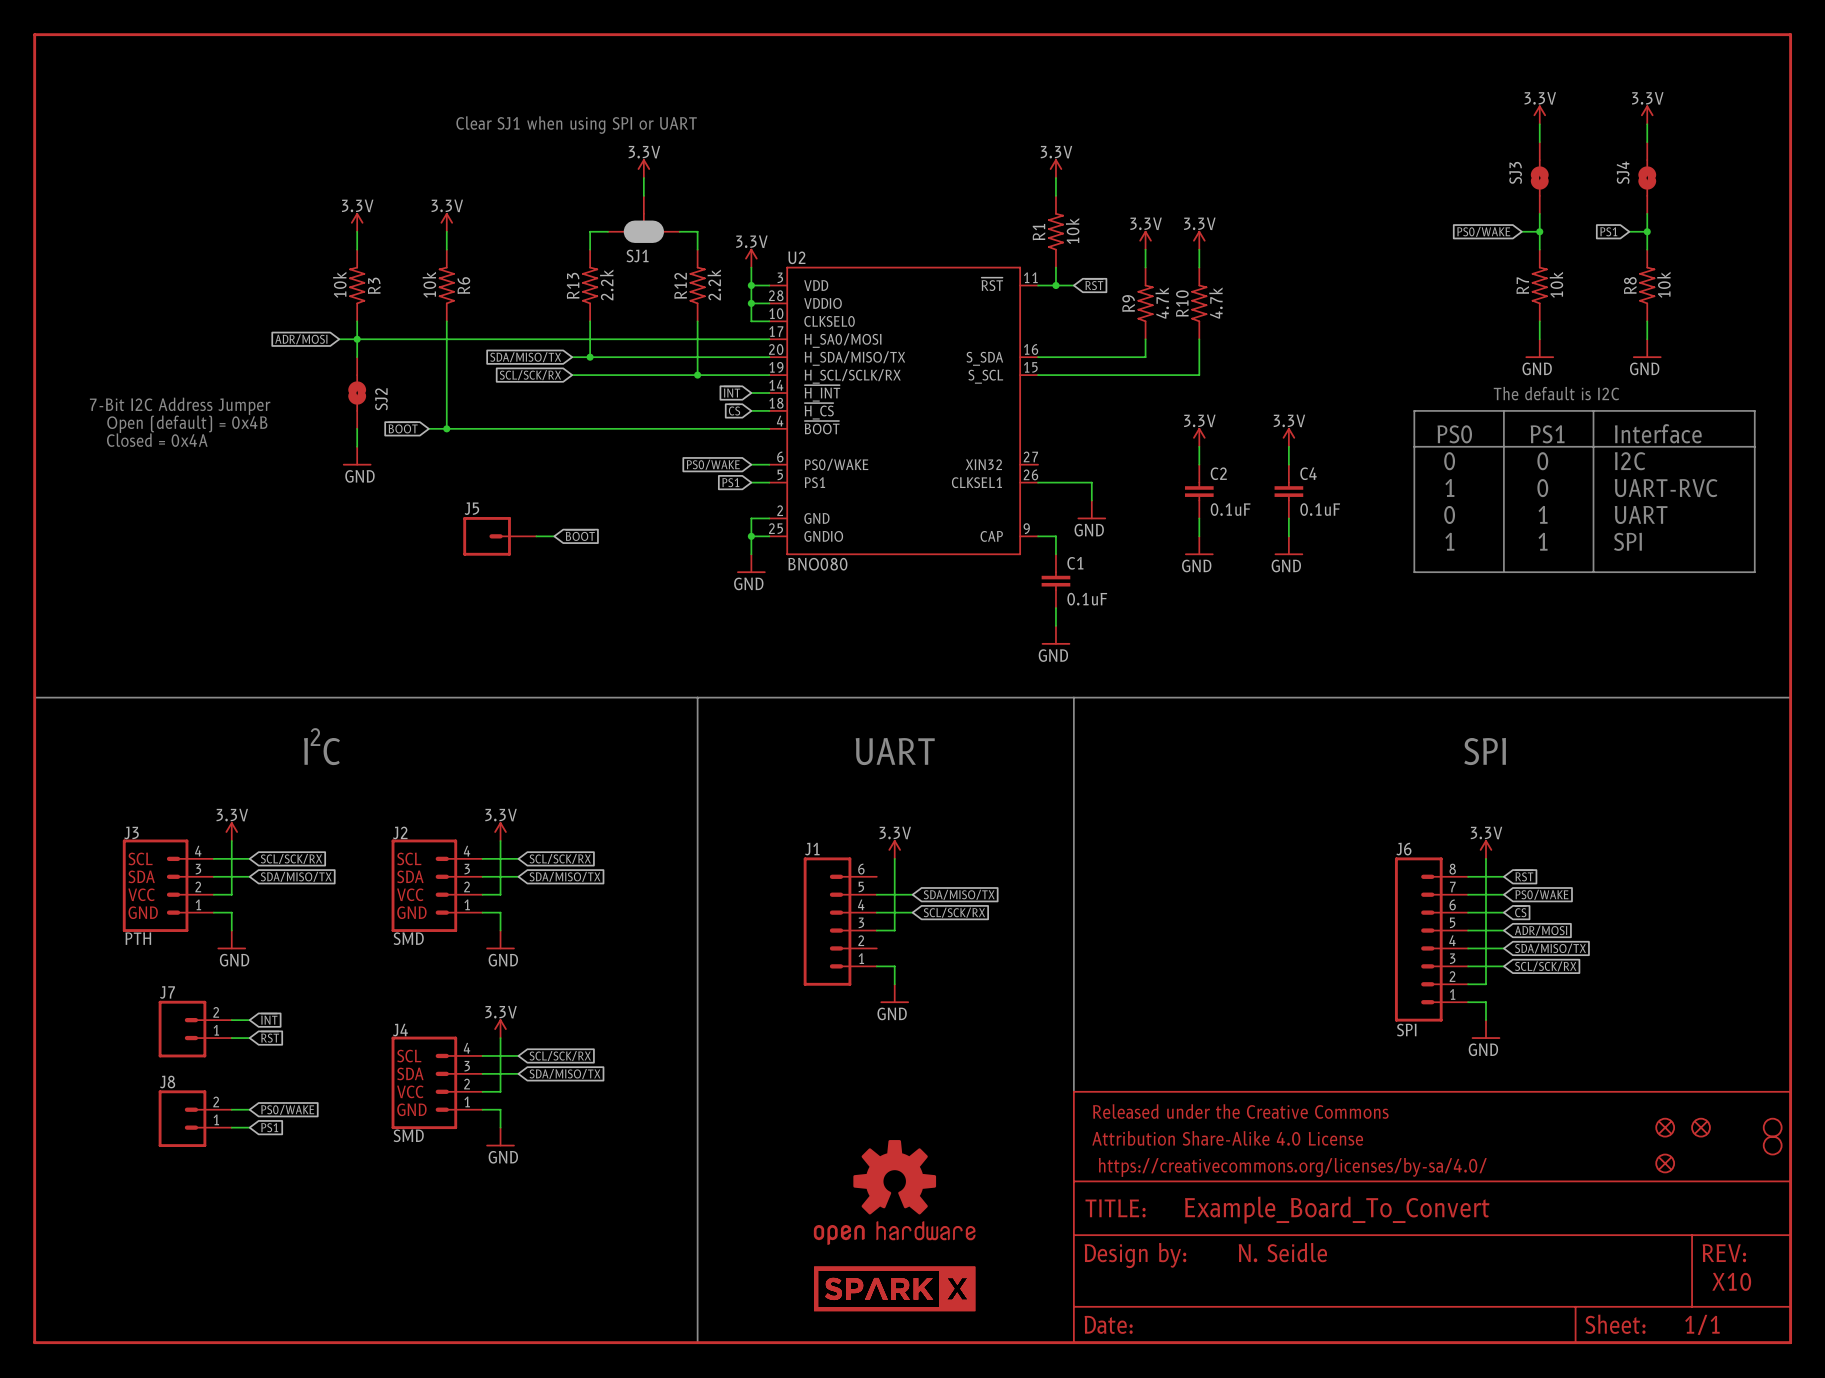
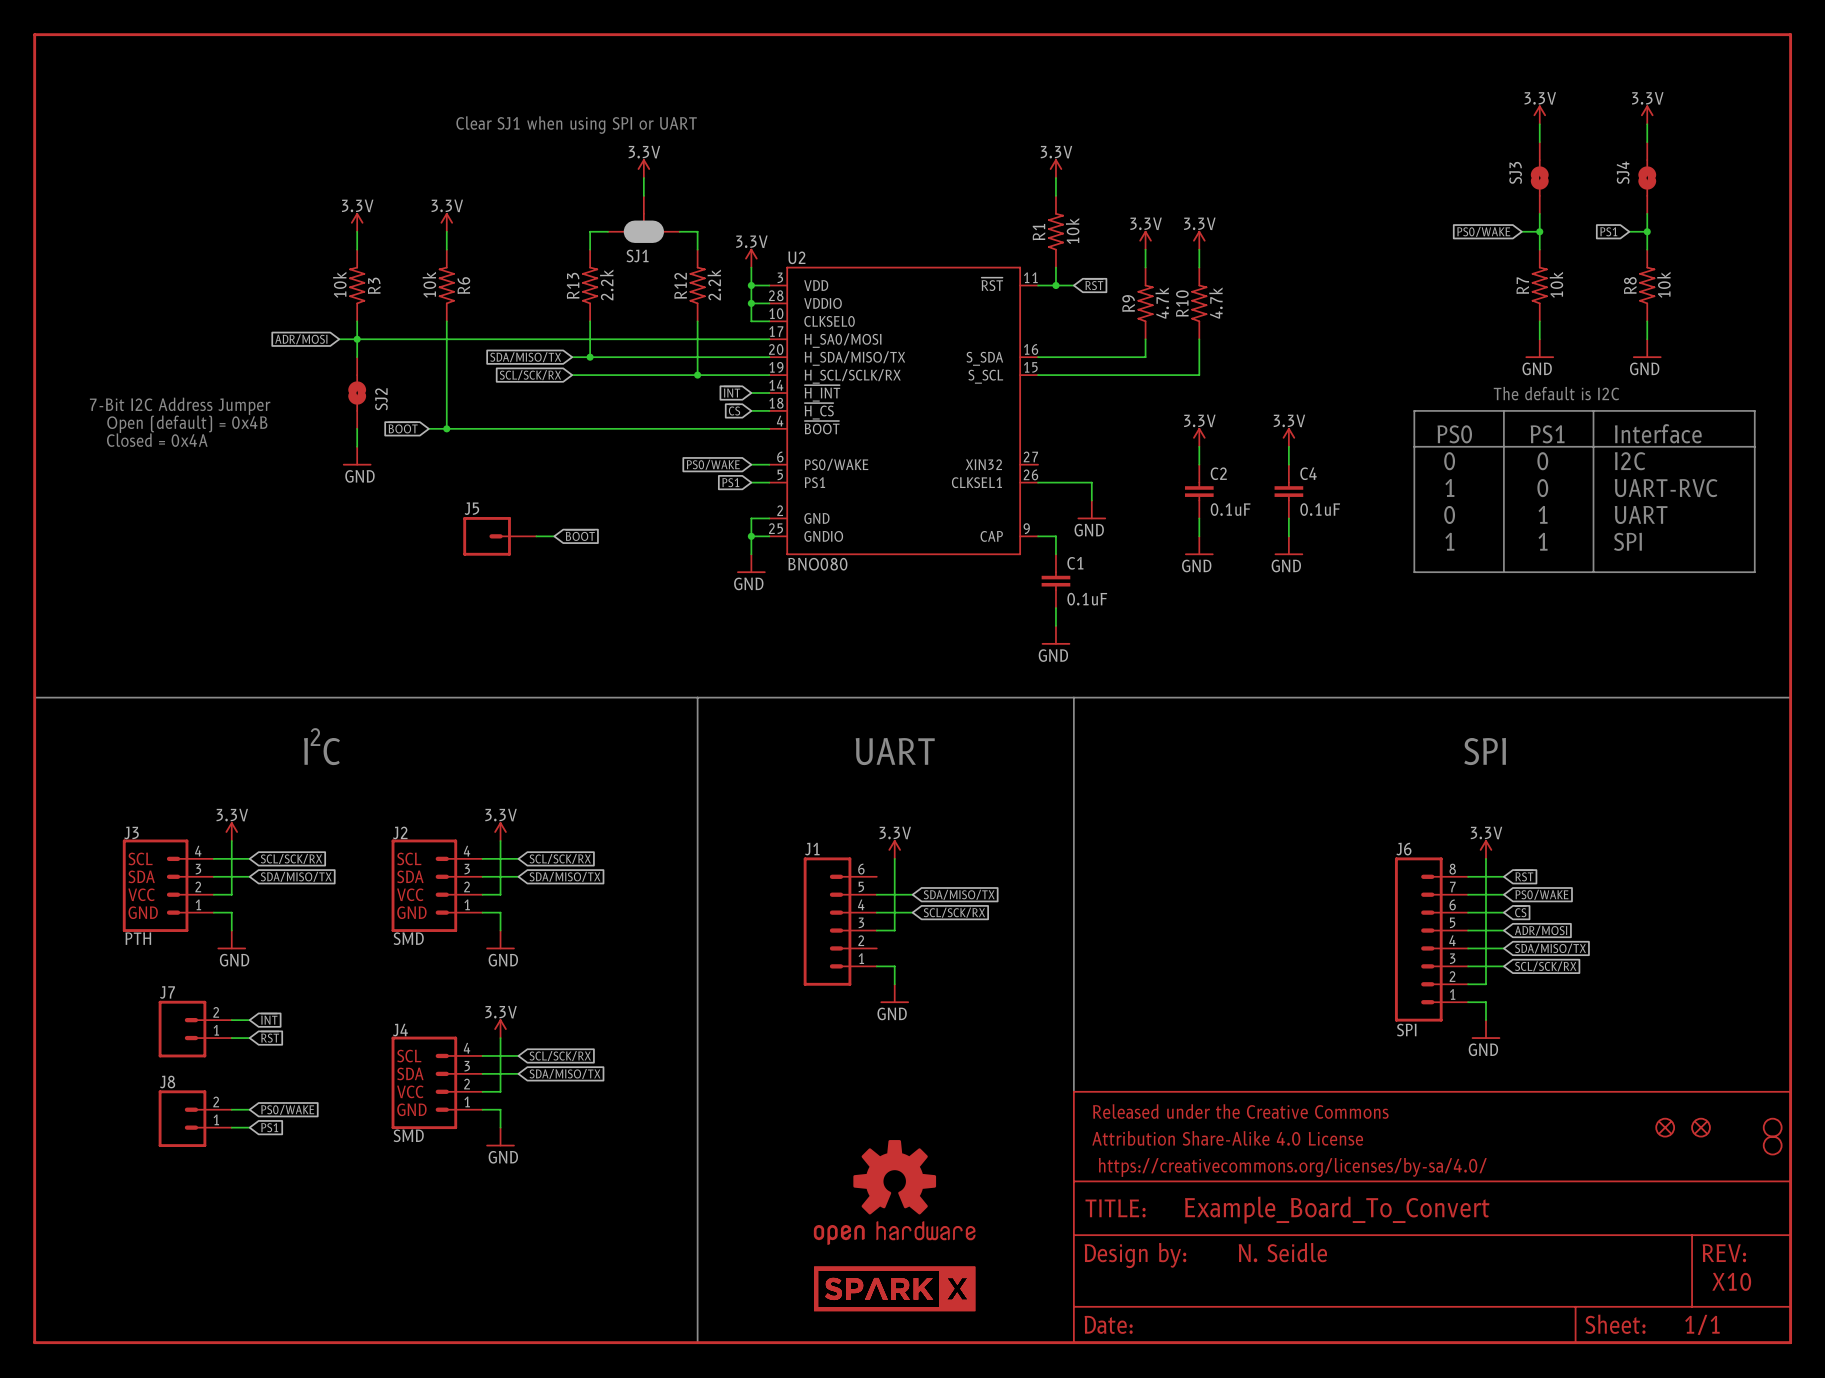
part: (1665, 1163) -> none

